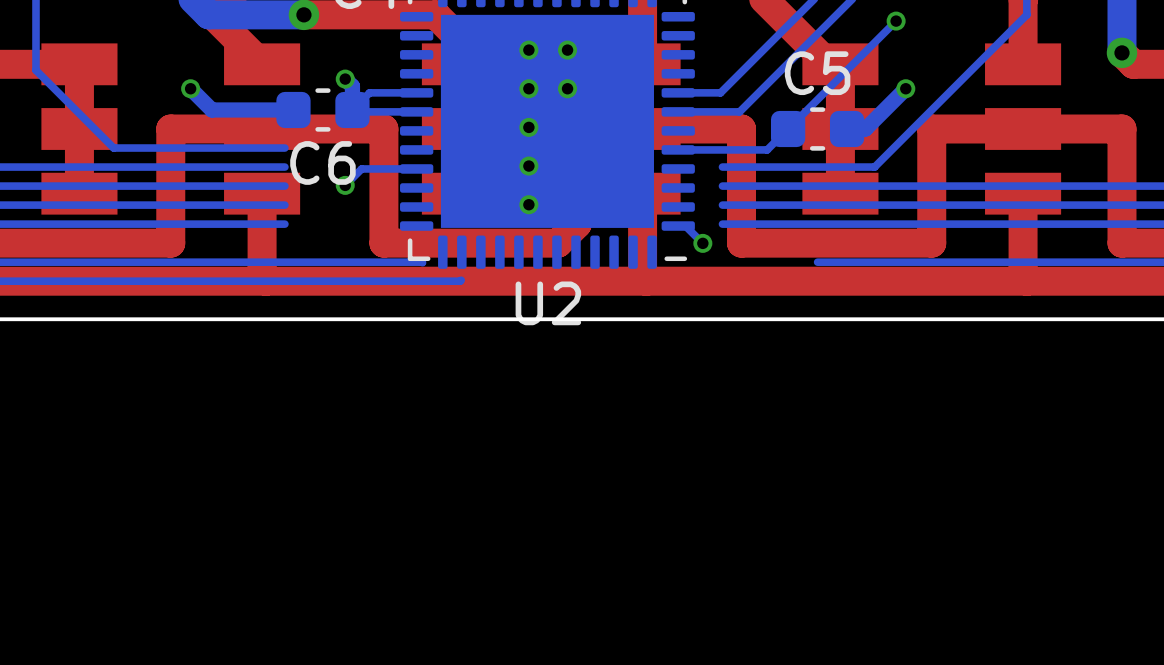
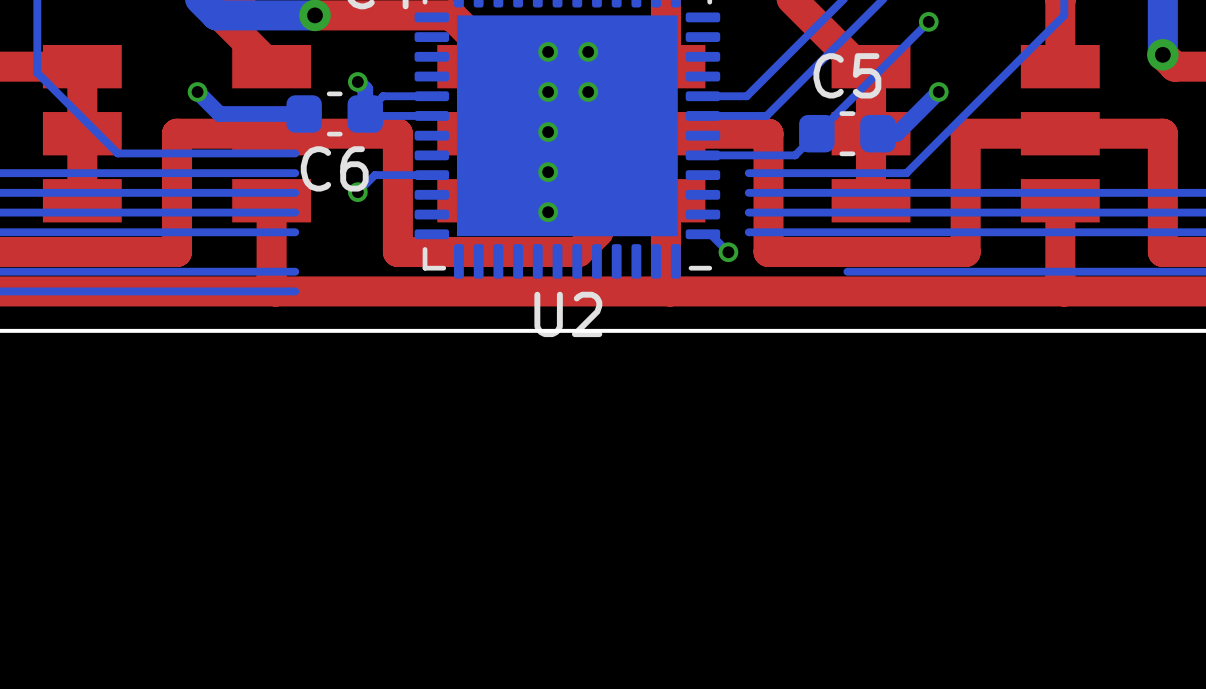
bottom track: (422, 262) (284, 262) -> none
bottom track: (461, 280) (284, 281) -> none

